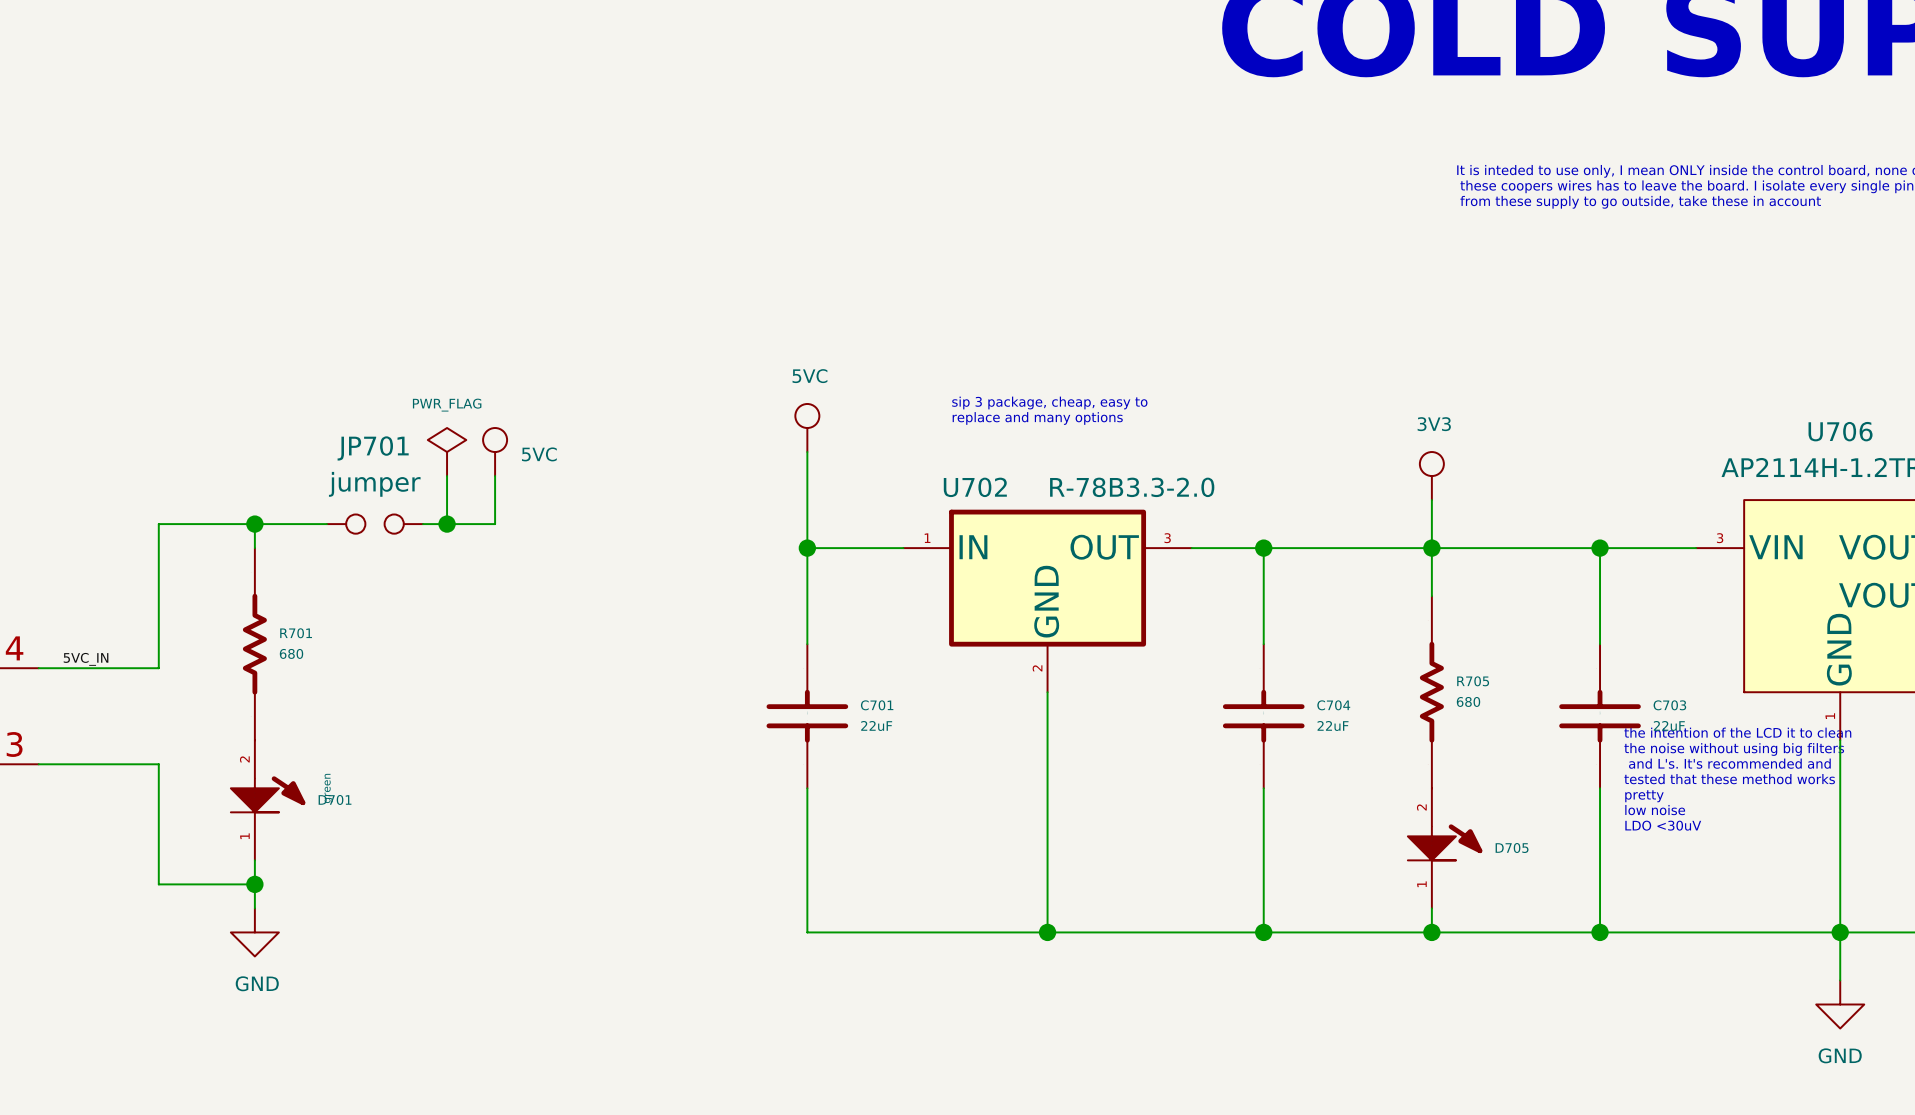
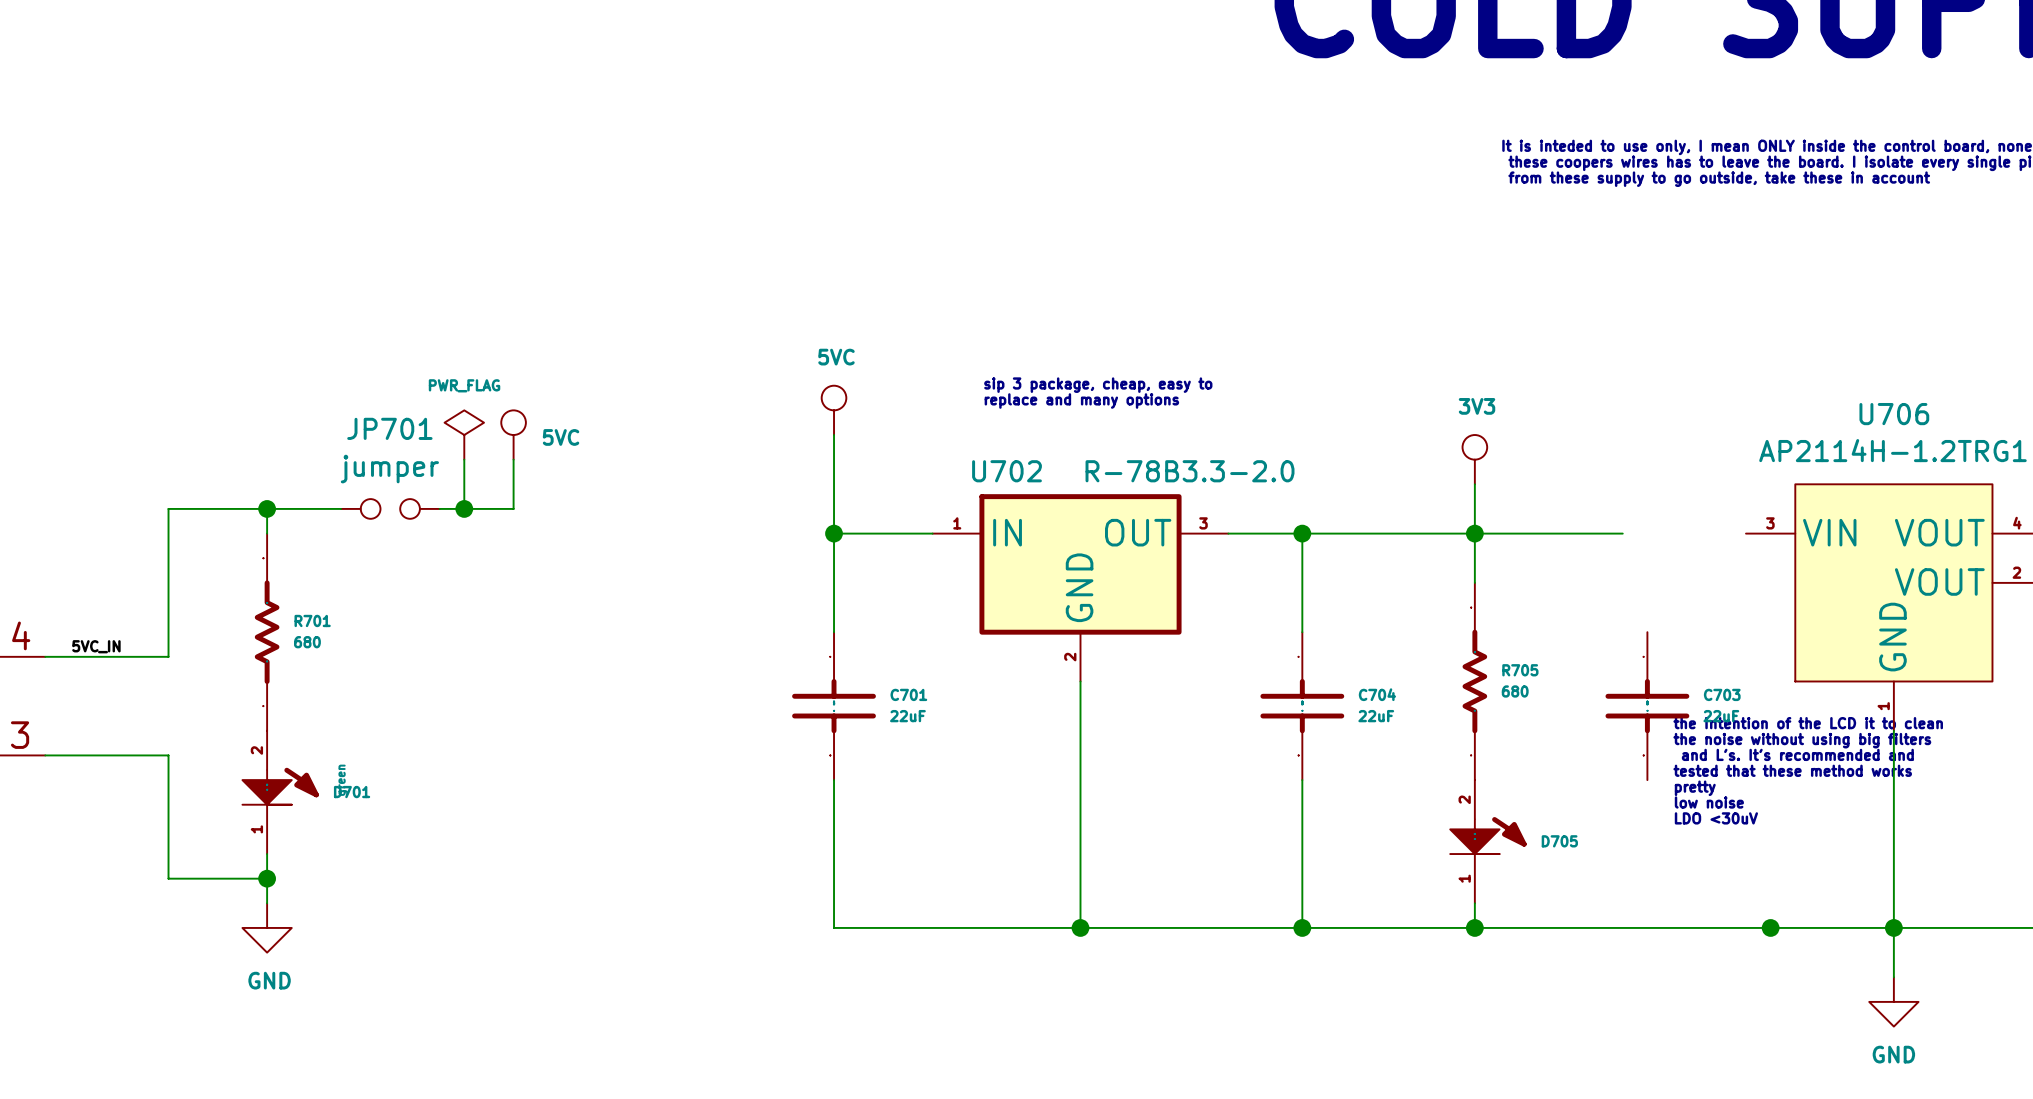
wire: (1576, 548) (1696, 548) -> none
wire: (1600, 548) (1600, 644) -> none
junction: (1600, 548) -> none
wire: (1600, 788) (1600, 932) -> none
junction: (1600, 932) -> none
junction: none -> (1770, 927)

